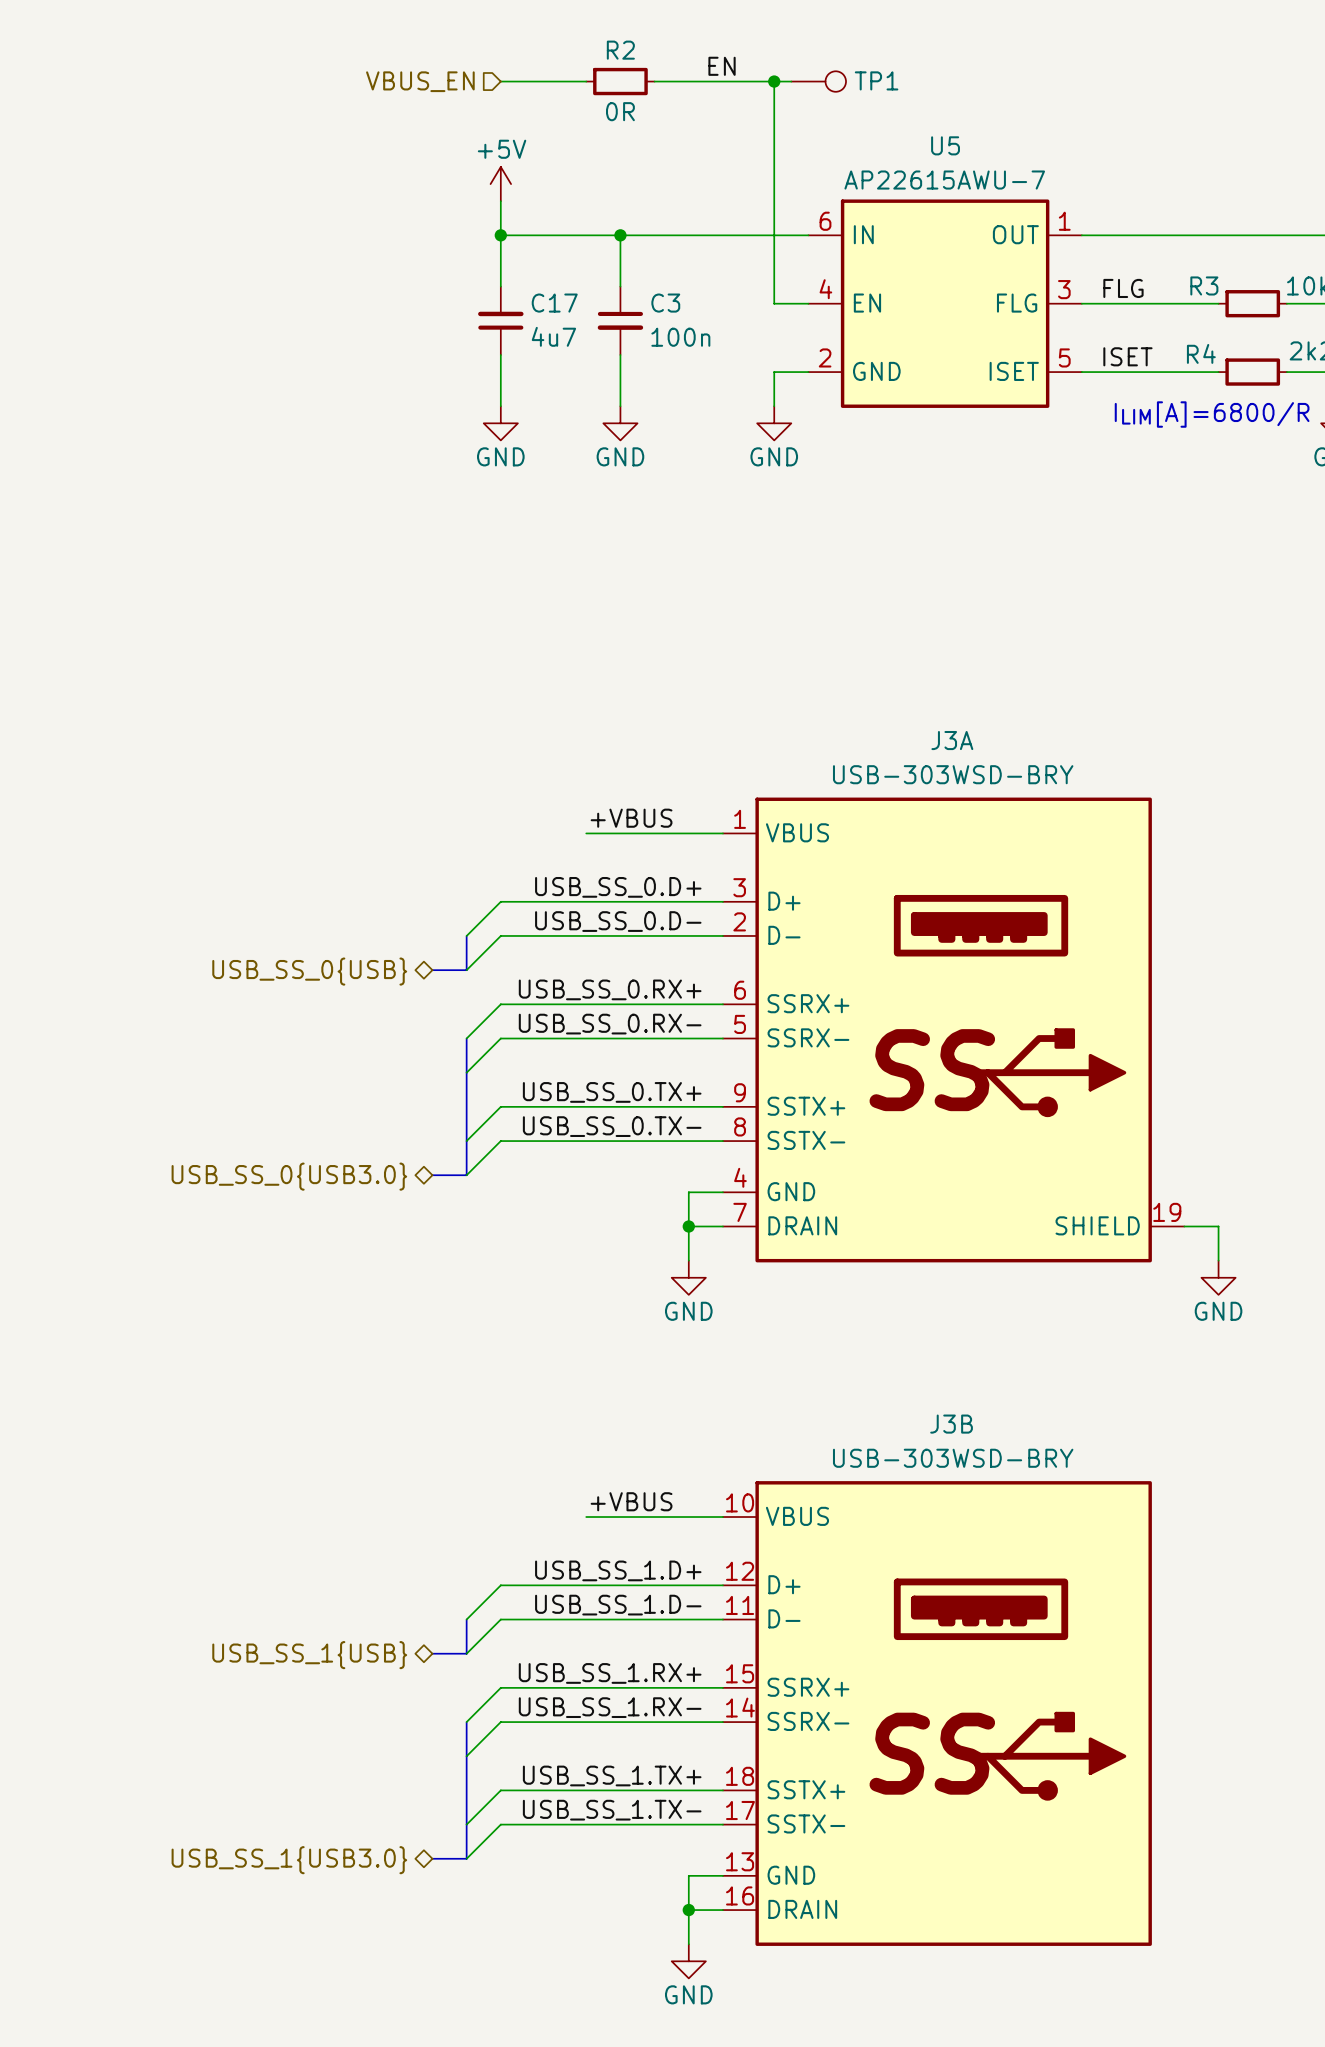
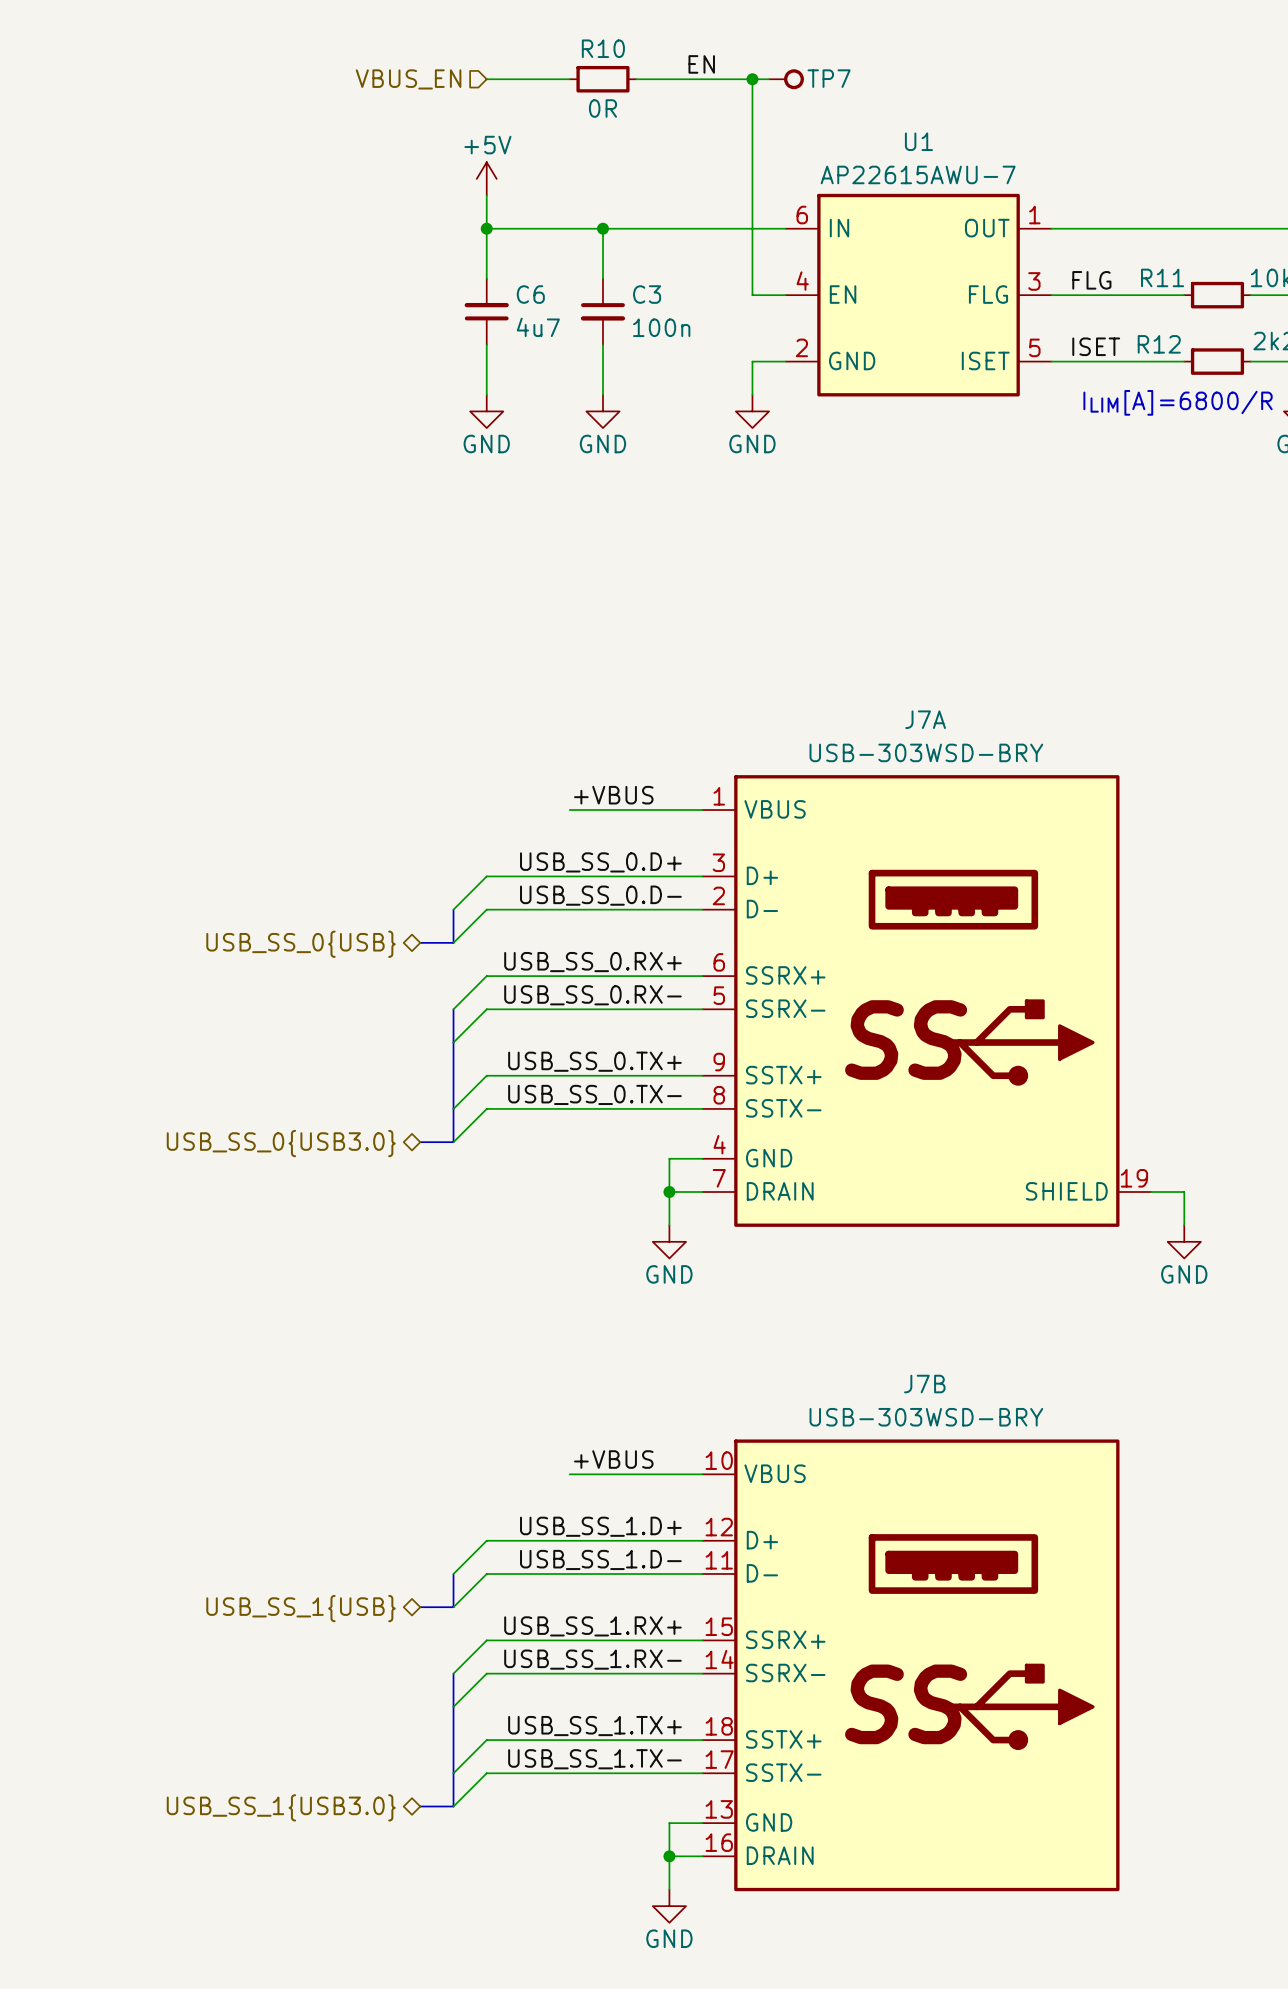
R2 name: R2 (620, 50) -> R10 (603, 48)
TP7: none -> (786, 79)
TP1: (818, 81) -> none
U5 name: U5 (945, 145) -> U1 (918, 141)
R3 name: R3 (1204, 285) -> R11 (1162, 277)
C17 name: C17 (554, 303) -> C6 (530, 294)
R4 name: R4 (1201, 353) -> R12 (1159, 344)
J3A name: J3A (952, 740) -> J7A (925, 719)
J3B name: J3B (951, 1424) -> J7B (924, 1384)

